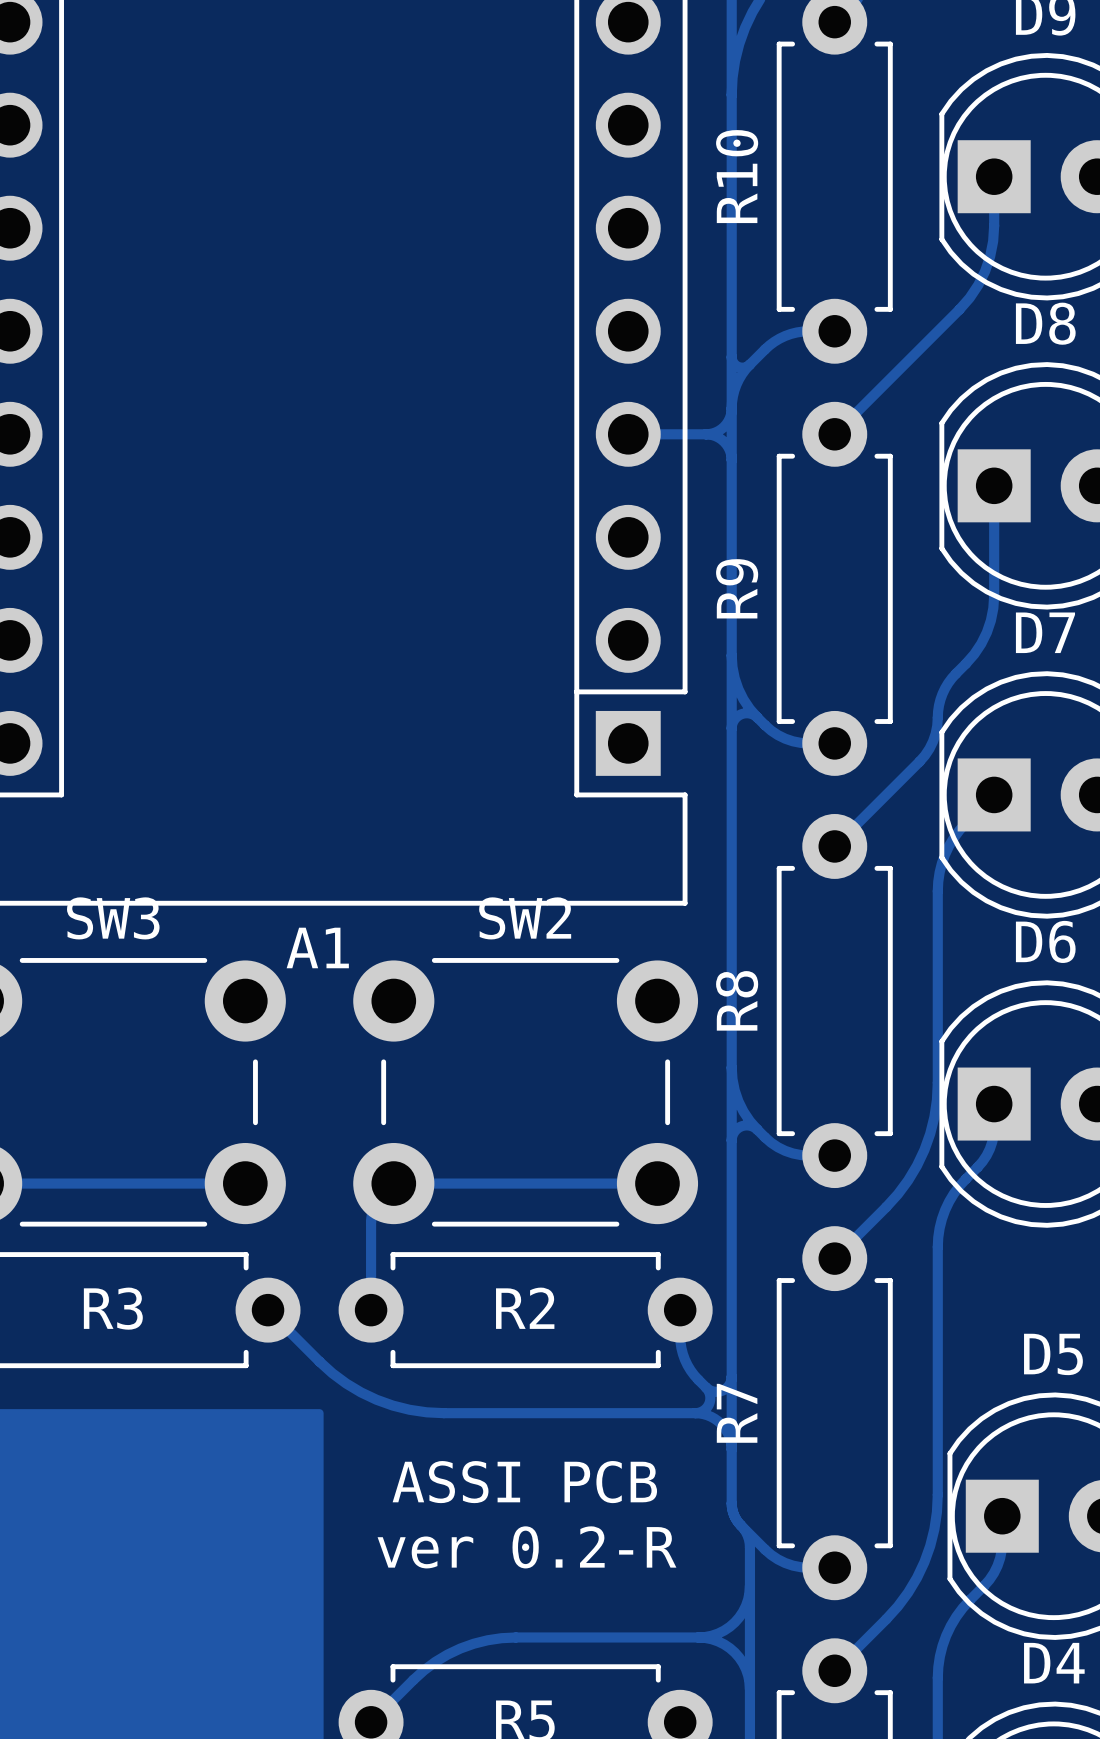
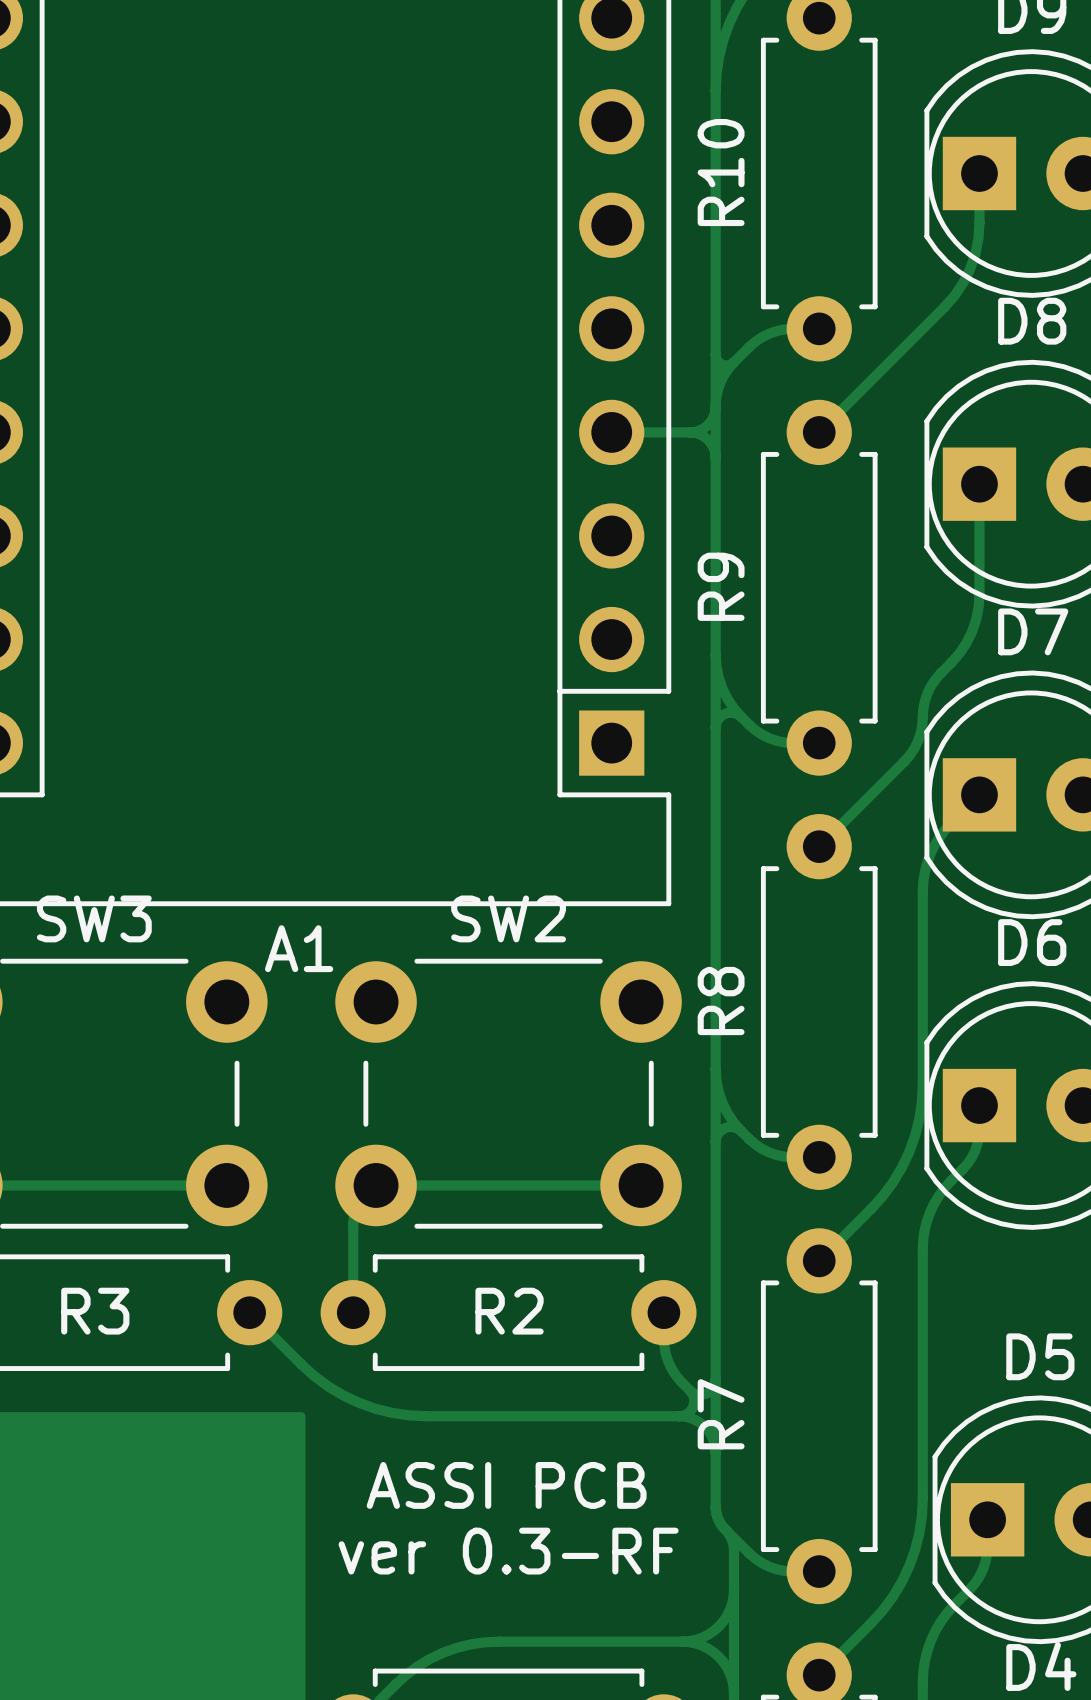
text: ver 0.2-R (526, 1547) -> ver 0.3-RF (508, 1551)

